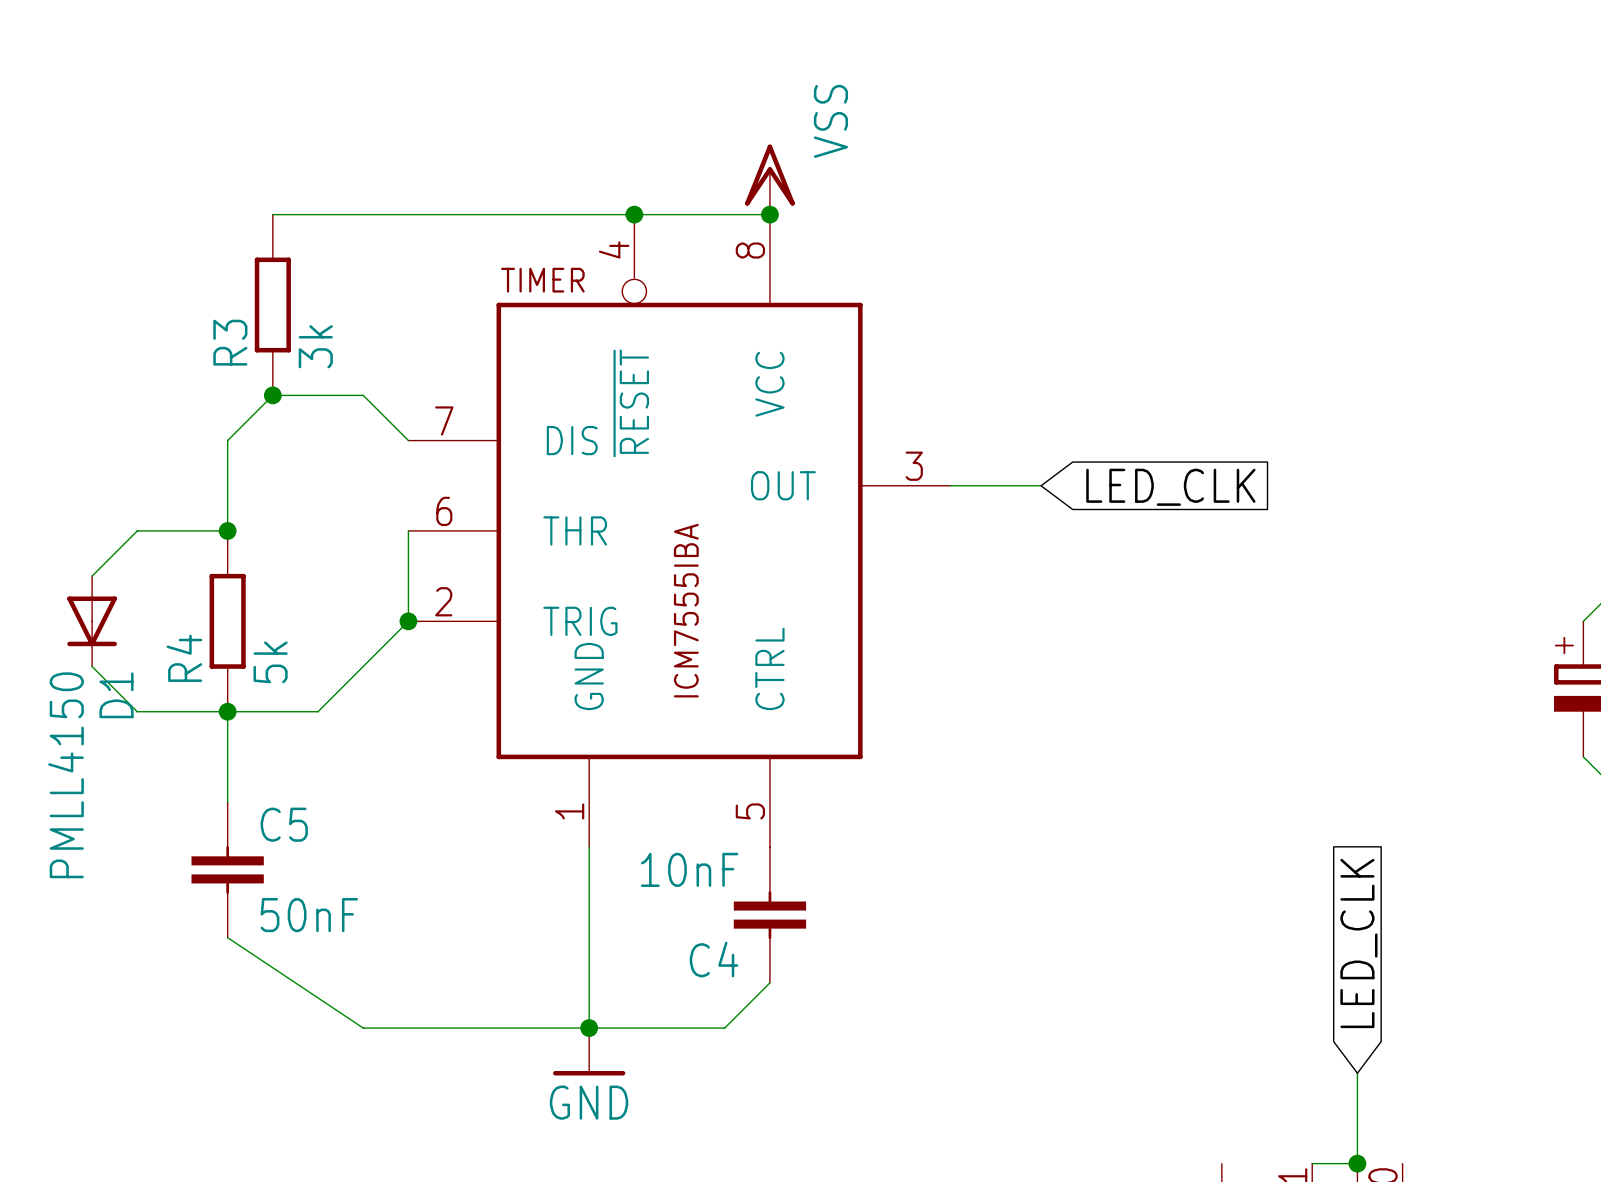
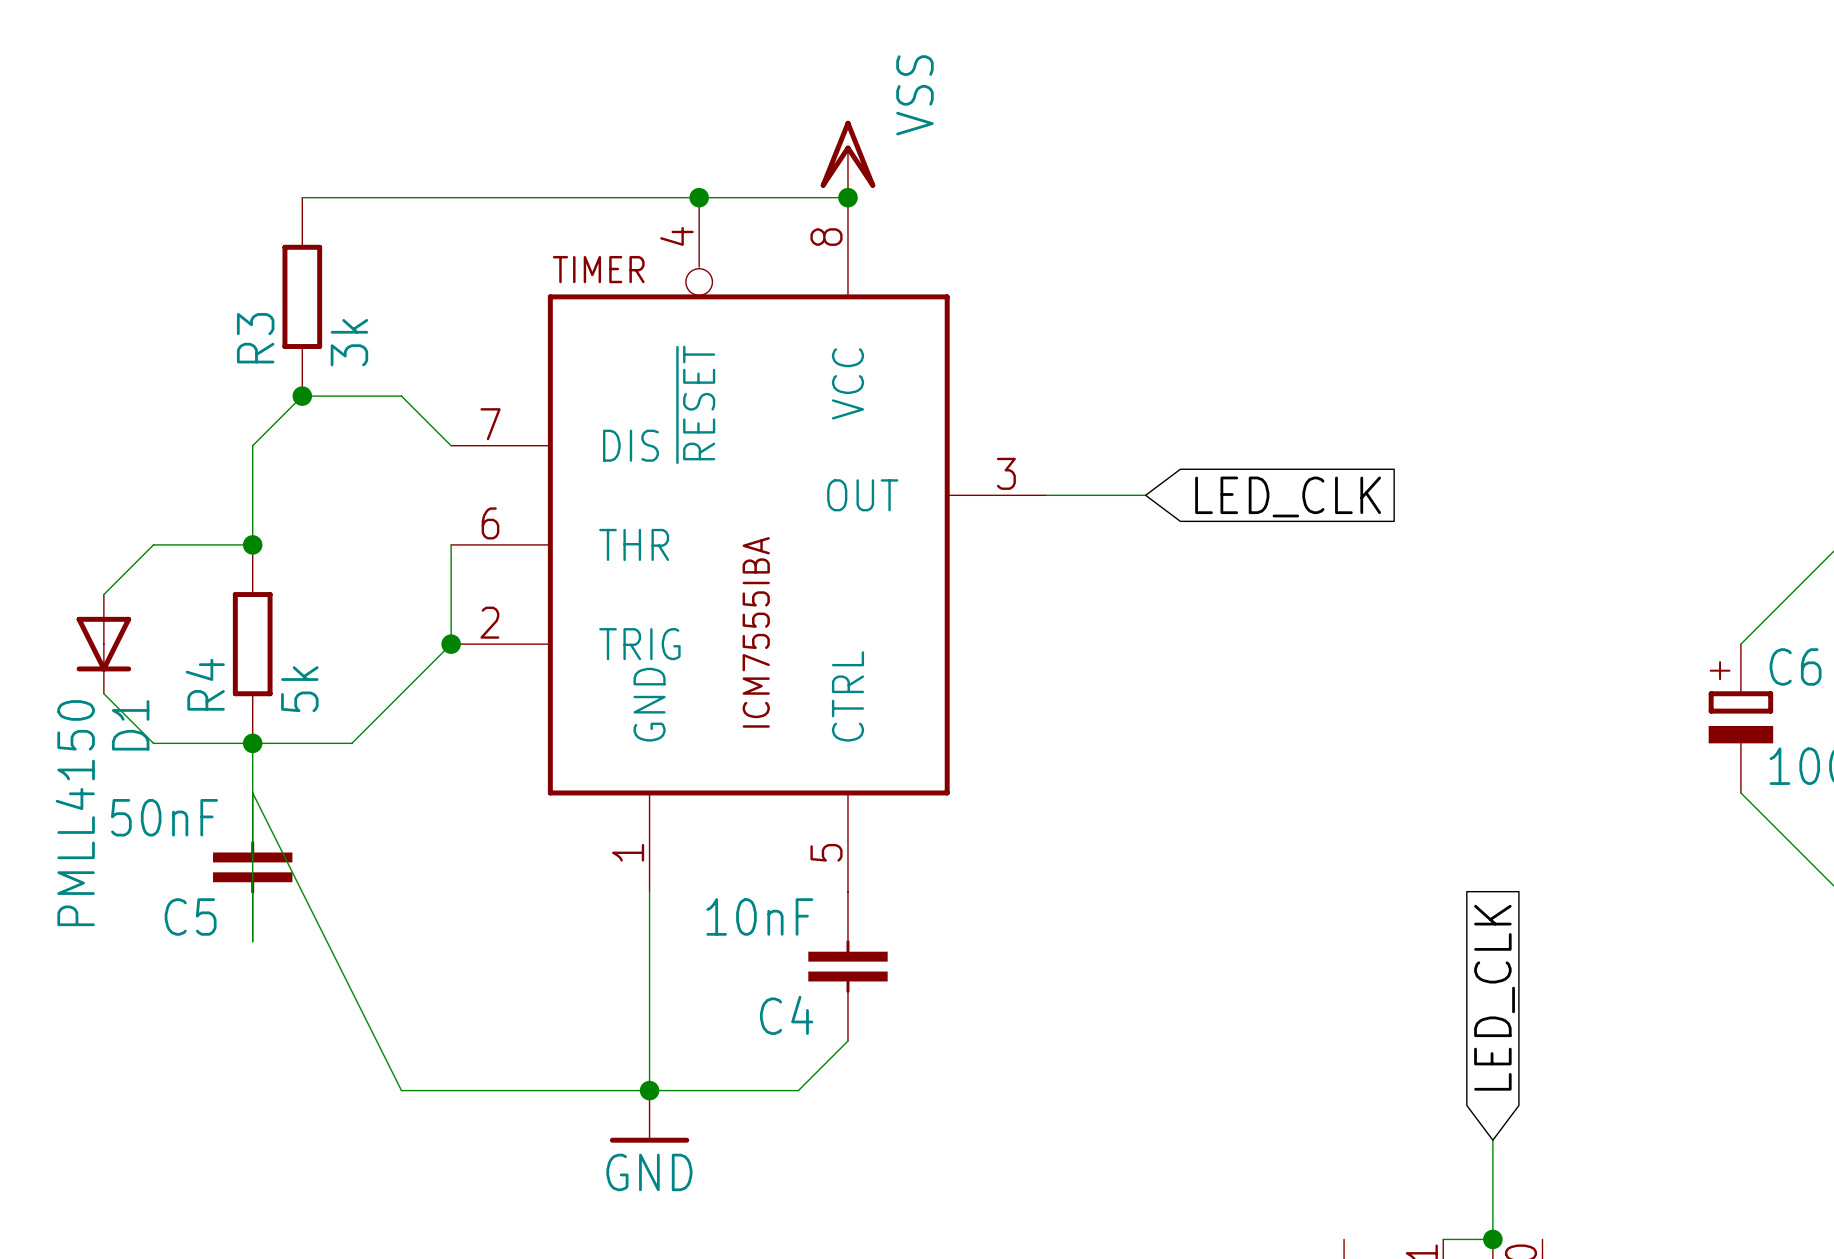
C5 name position: C5 (284, 824) -> C5 (190, 916)
C5 position: (227, 869) -> (252, 867)
C5 value position: 50nF (309, 915) -> 50nF (164, 817)
wire: (227, 937) (363, 1028) -> (252, 792) (401, 1090)

